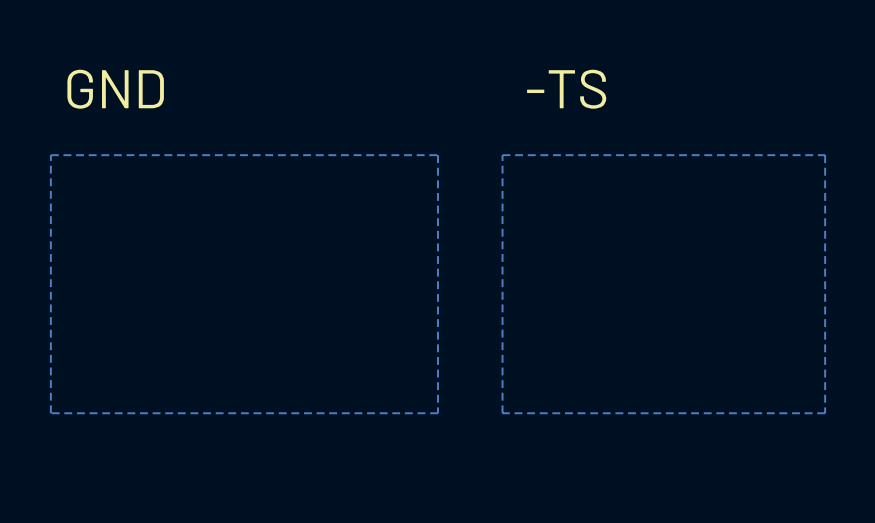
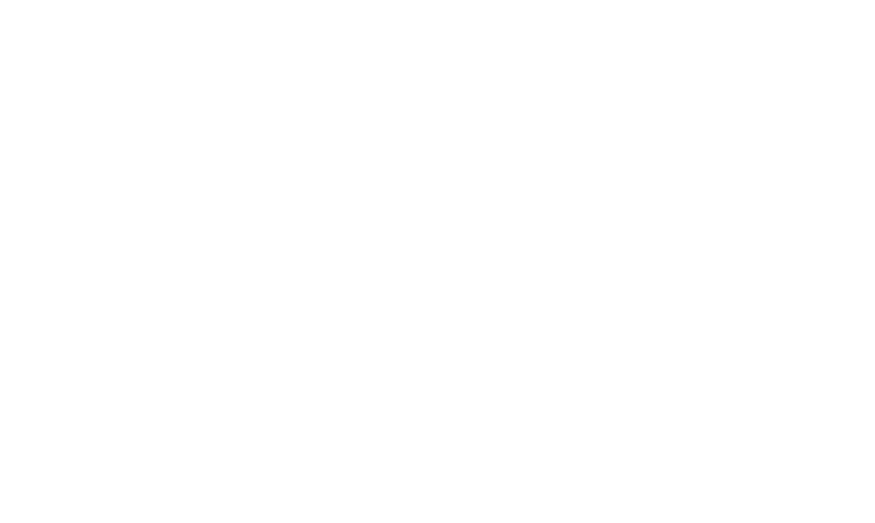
text: GND (115, 89) -> none
text: -TS (566, 89) -> none
bottom zone outline: (50, 155) (50, 413) (438, 413) (438, 155) (50, 155) -> none
bottom zone outline: (502, 155) (825, 155) (825, 413) (502, 413) (502, 155) -> none

